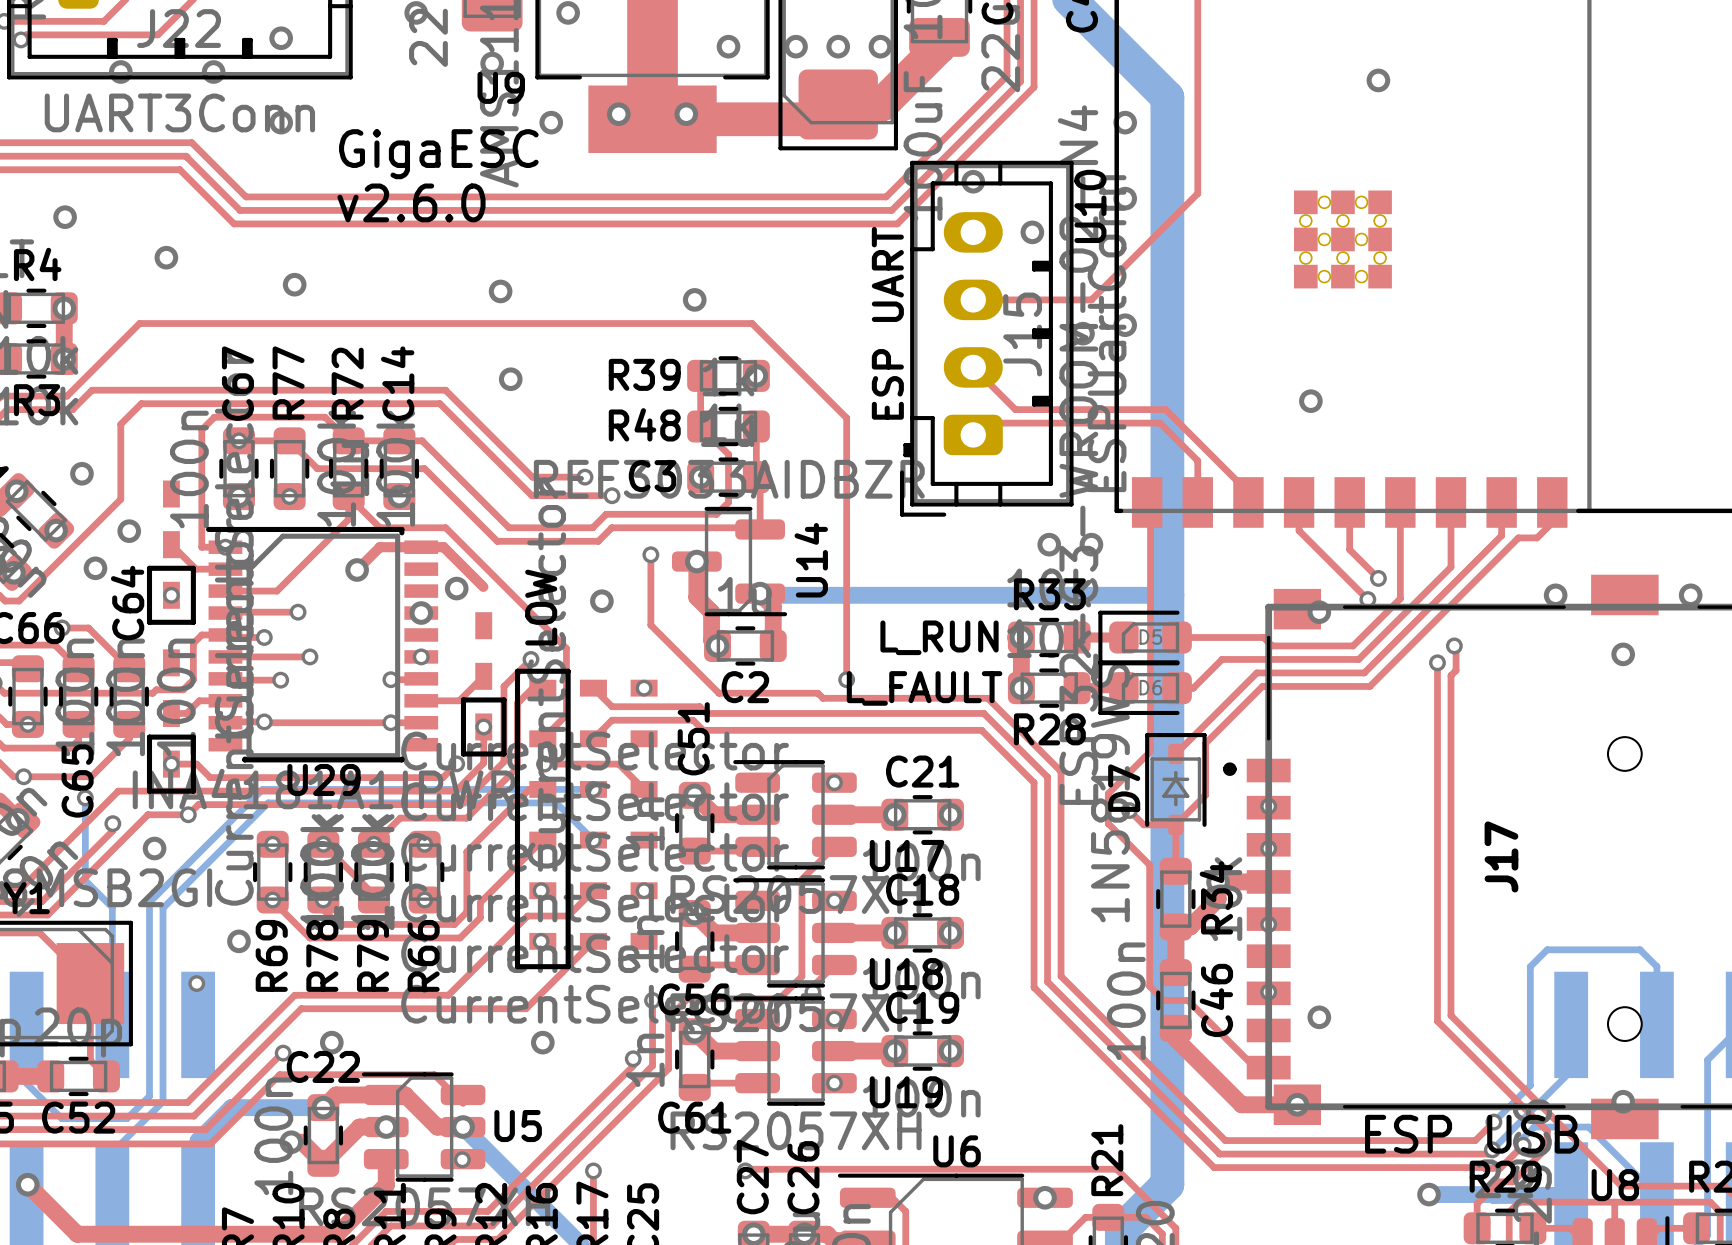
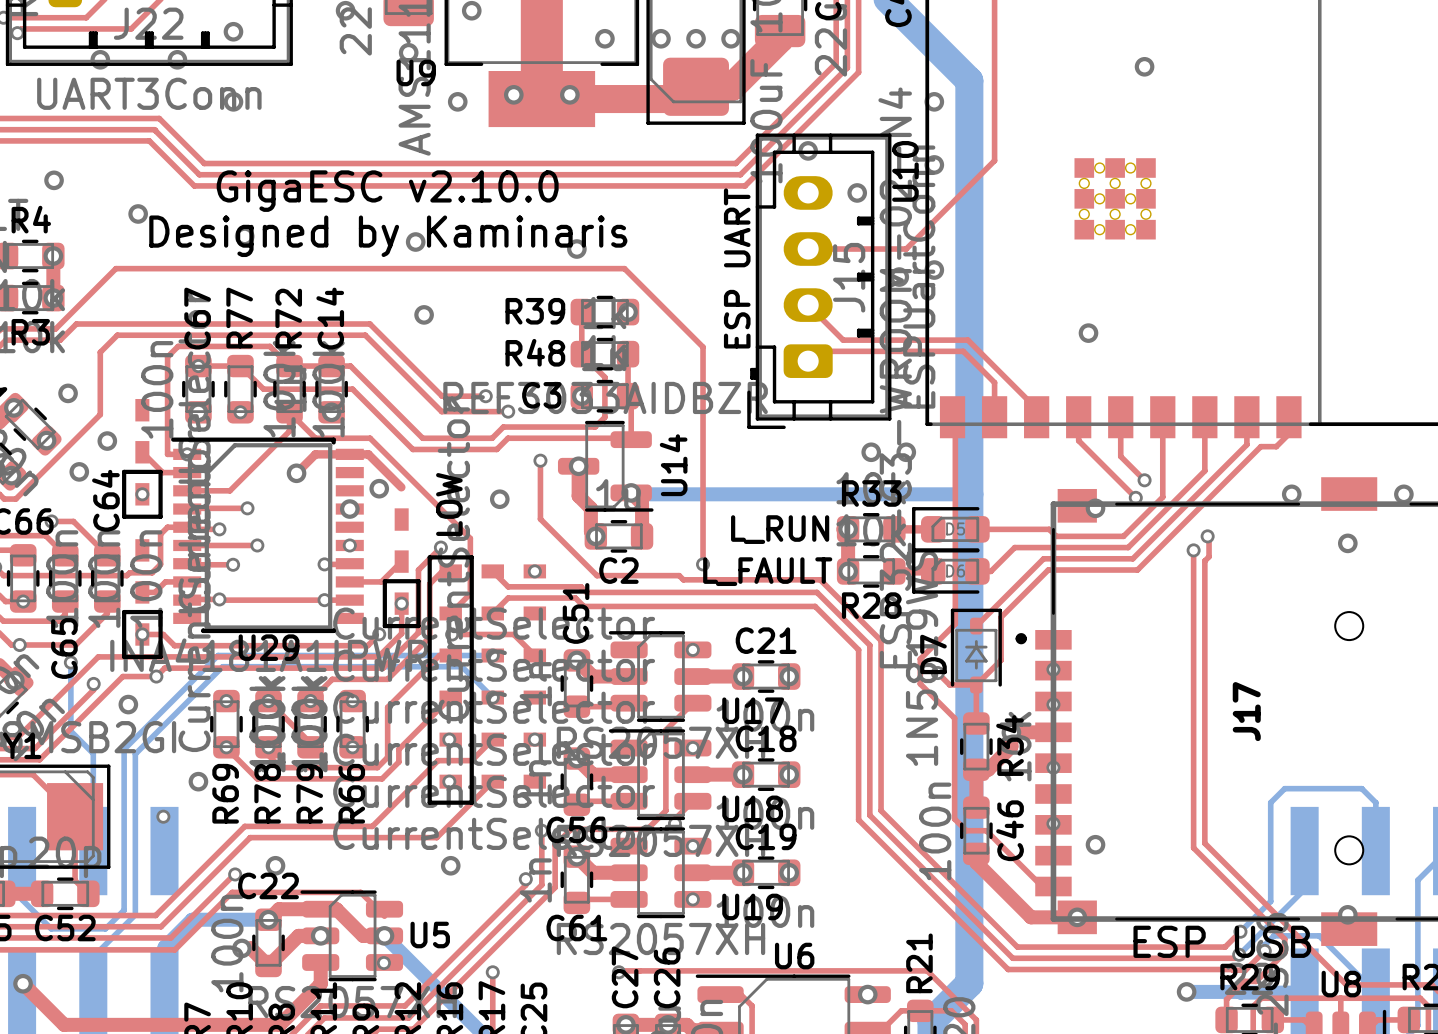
text: GigaESC (438, 154) -> none
text: v2.6.0 (411, 202) -> none
text: none -> GigaESC v2.10.0 (387, 191)
text: none -> Designed by Kaminaris (388, 236)

